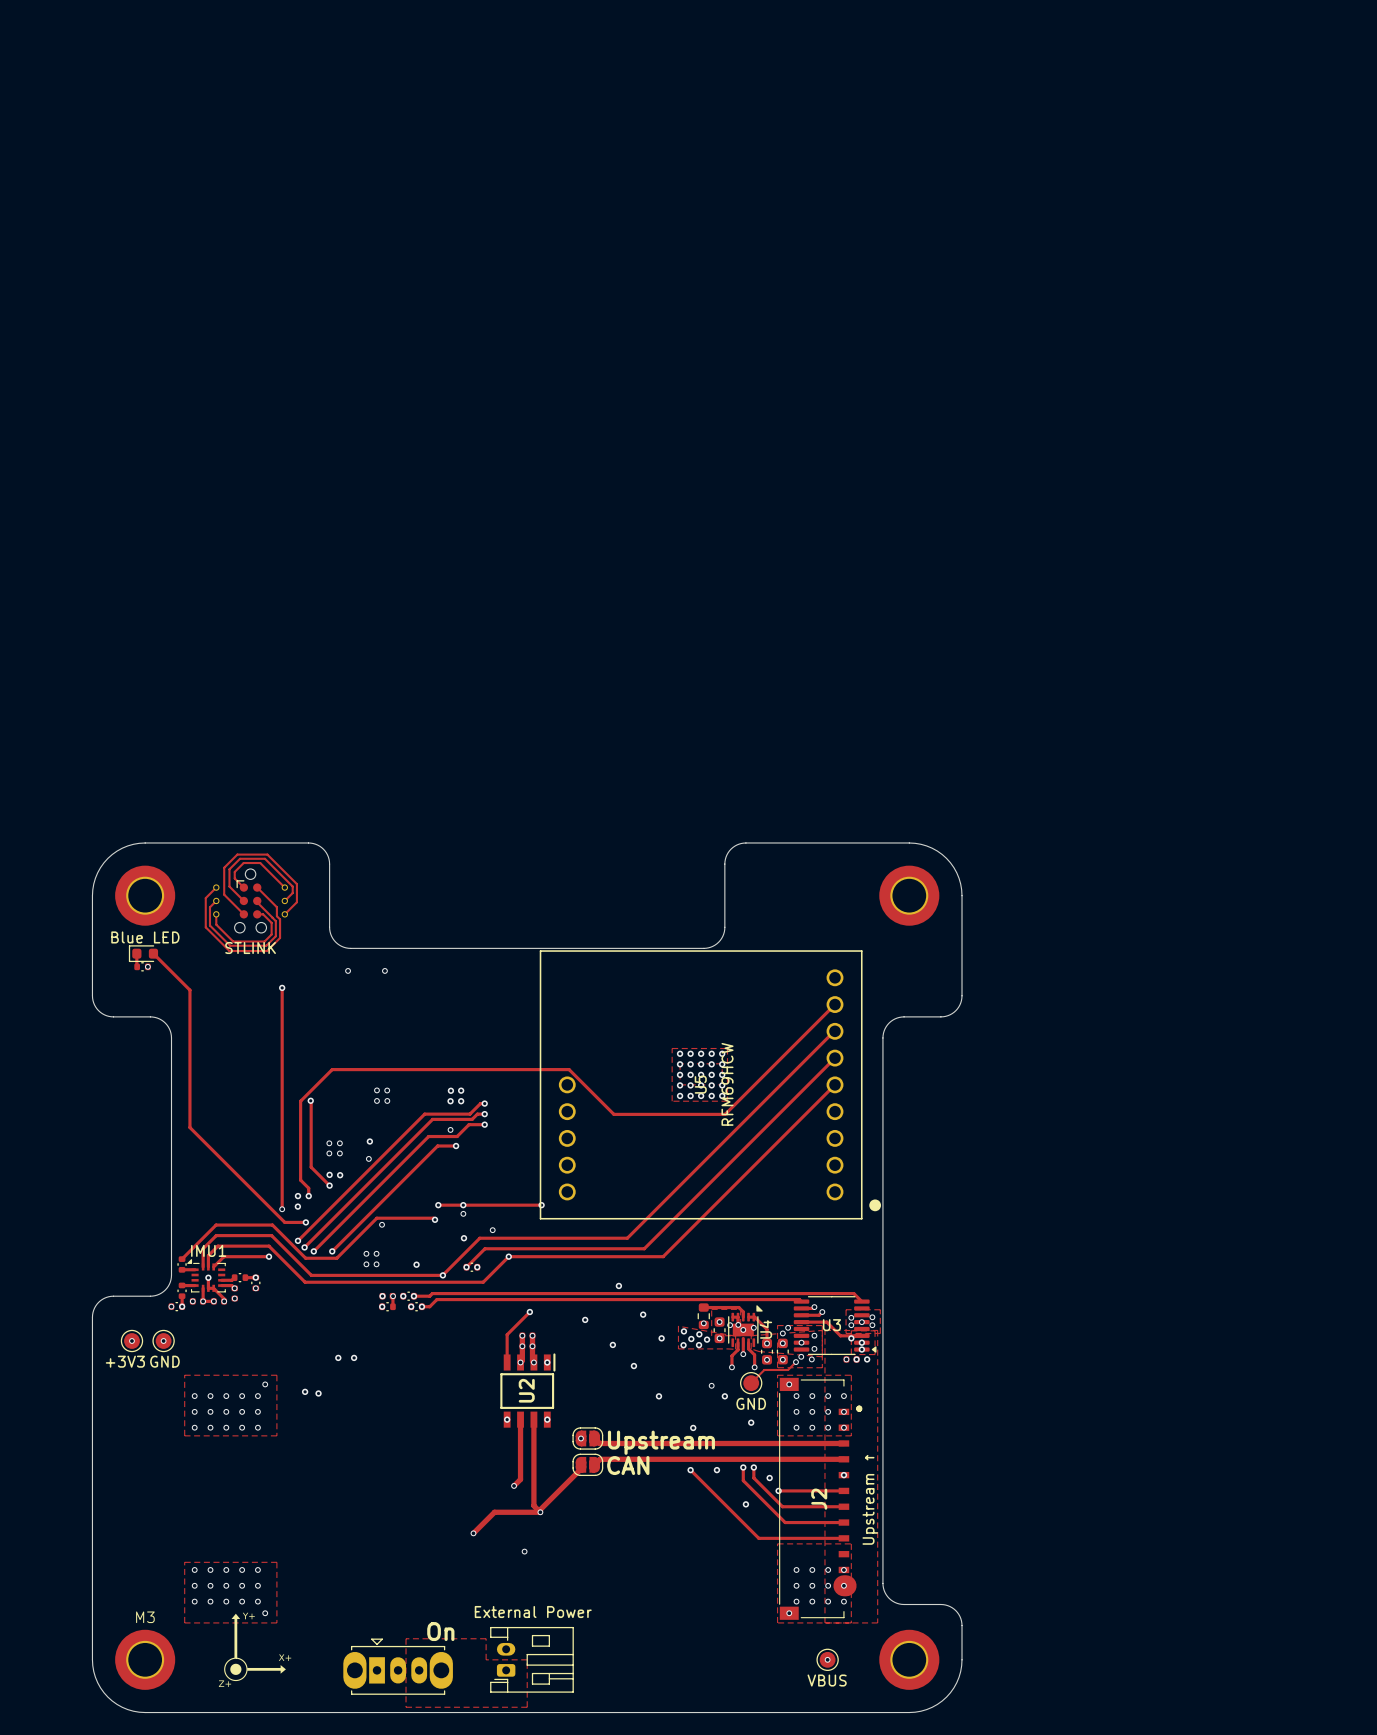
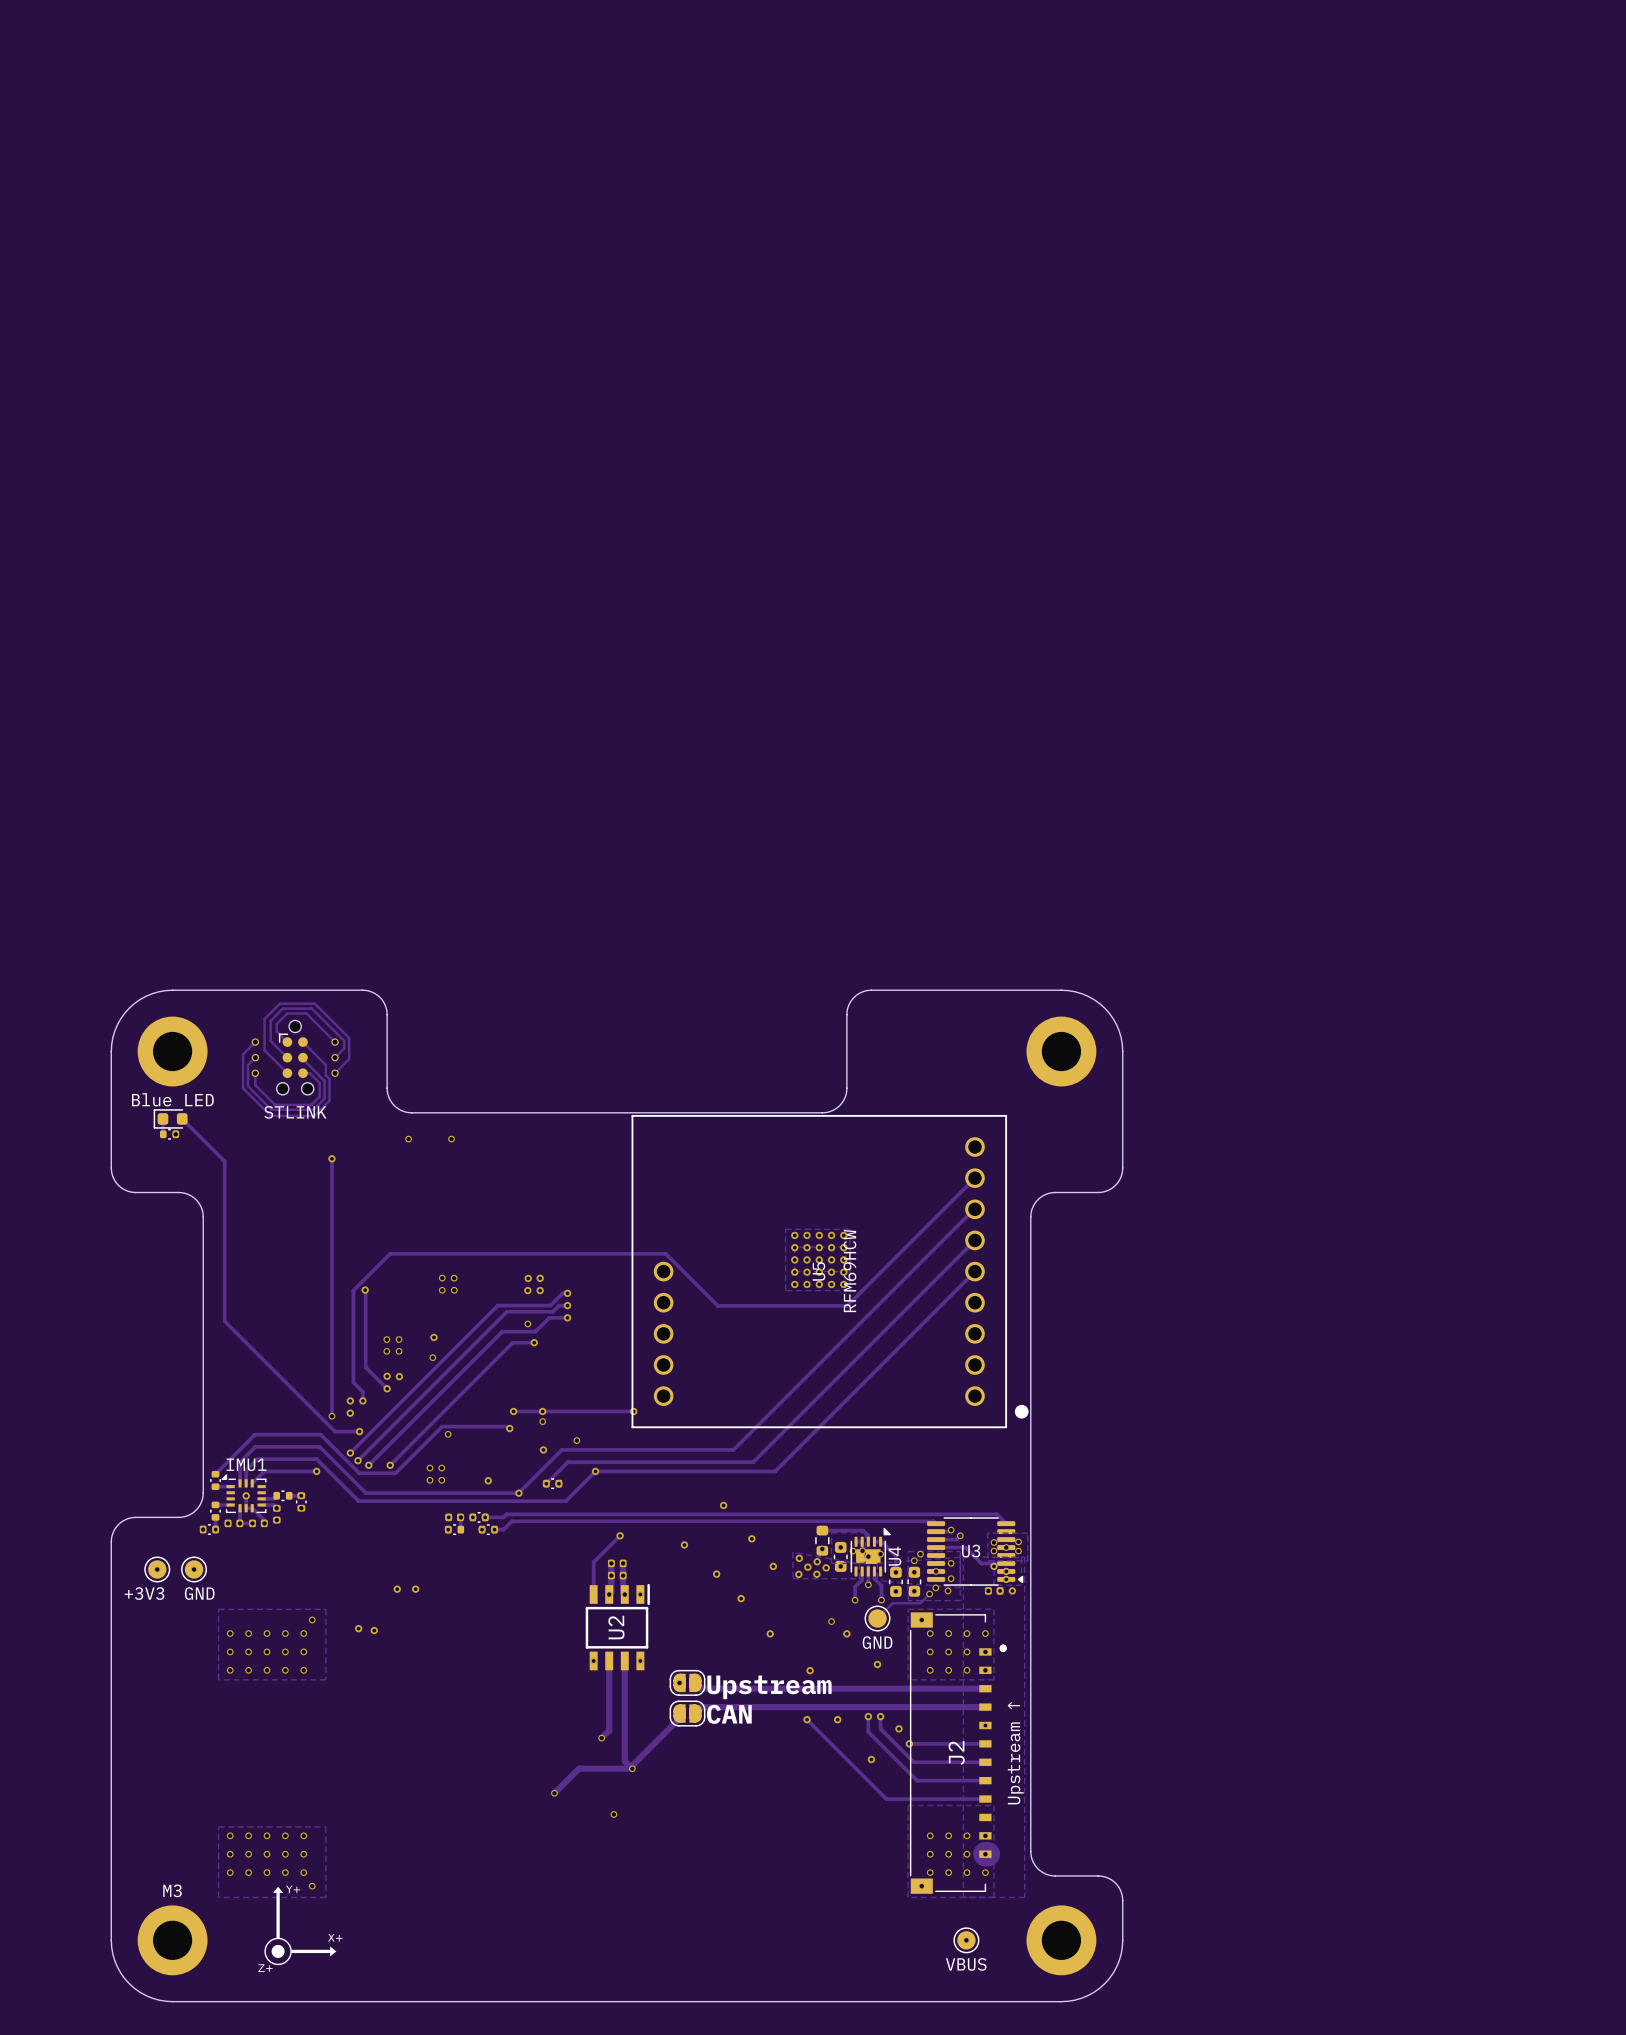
text: On (440, 1631) -> none
zone outline: (406, 1638) (406, 1707) (527, 1707) (527, 1659) (486, 1659) (486, 1638) (406, 1638) -> none
part: External Power (531, 1659) -> none
part: (398, 1666) -> none

